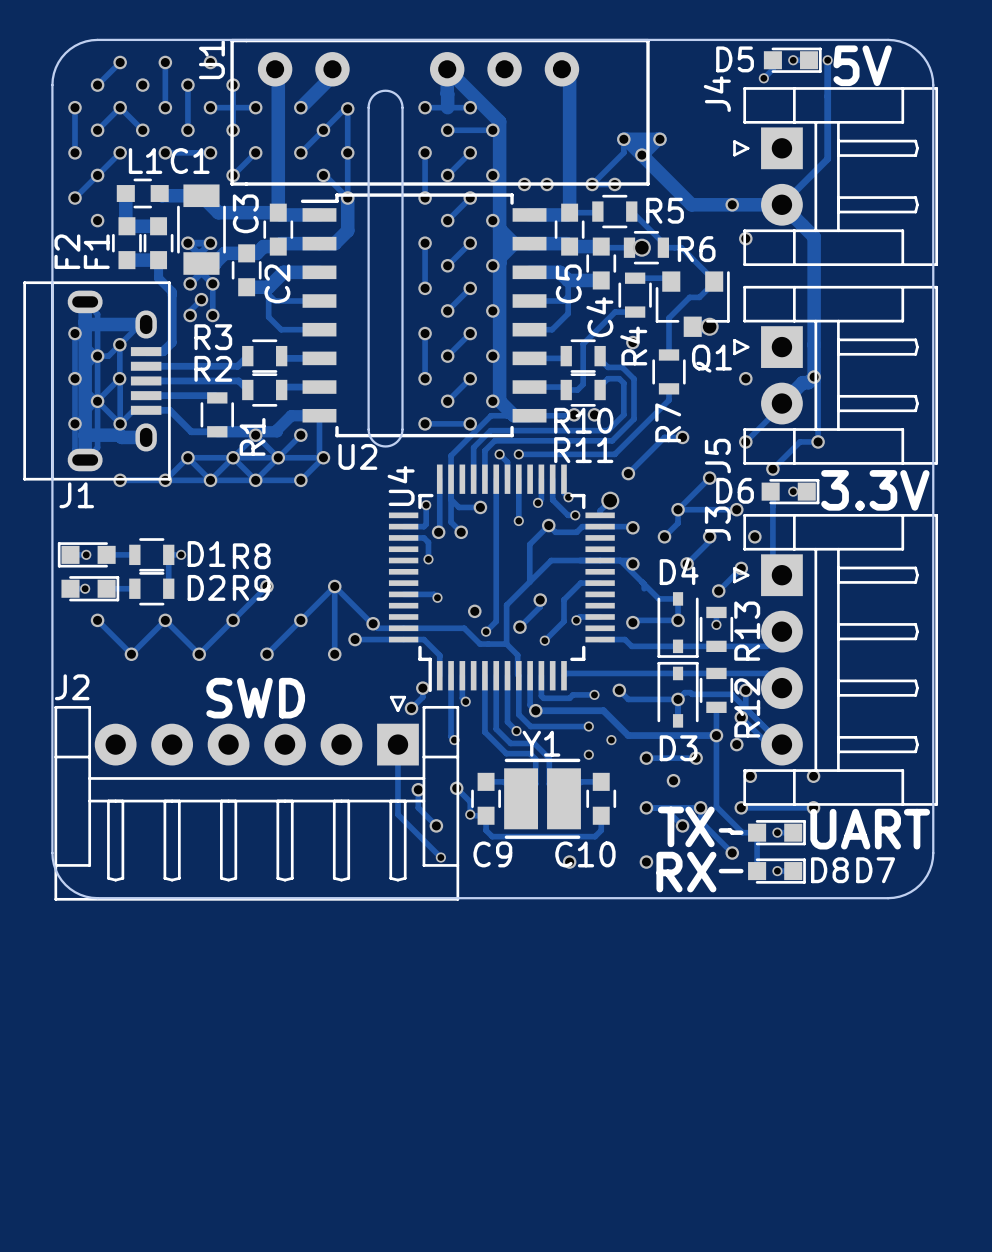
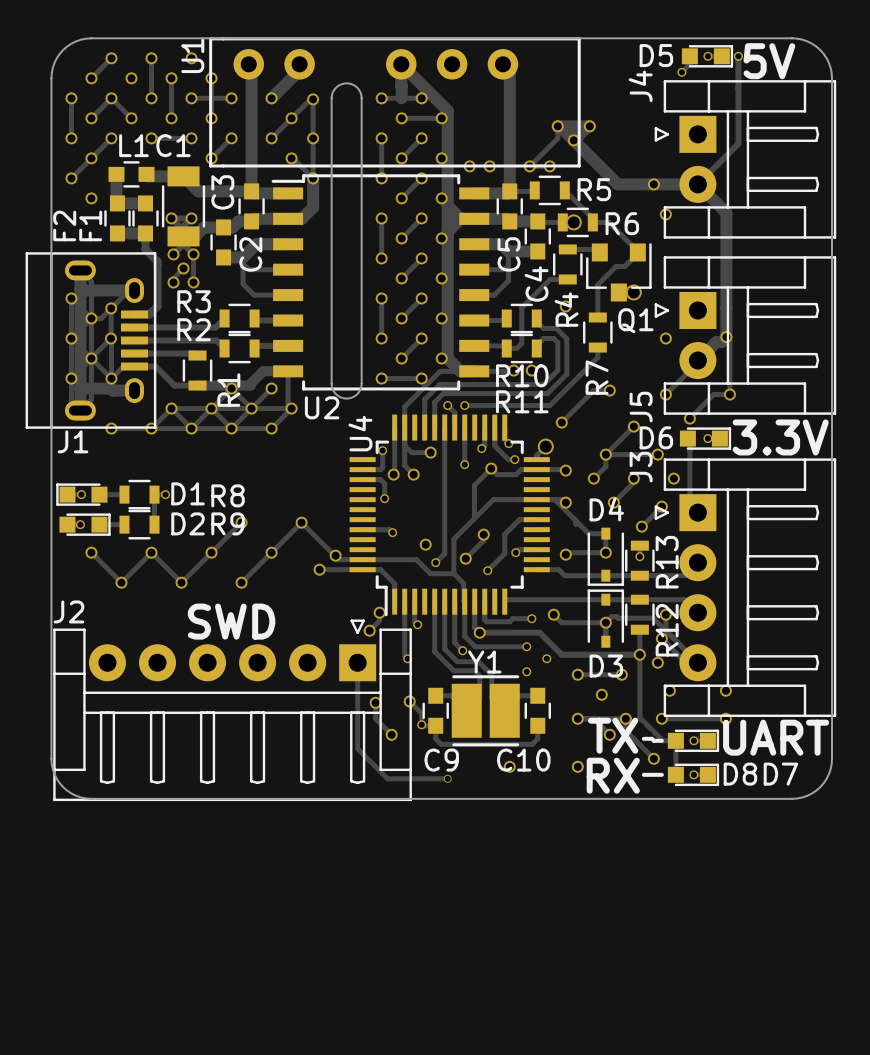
track: (334, 586) (334, 654) -> none
via: (334, 654) -> none
track: (397, 814) (440, 857) -> (357, 724) (357, 748) (387, 778) (447, 778)
via: (440, 857) -> none
via: none -> (447, 778)

